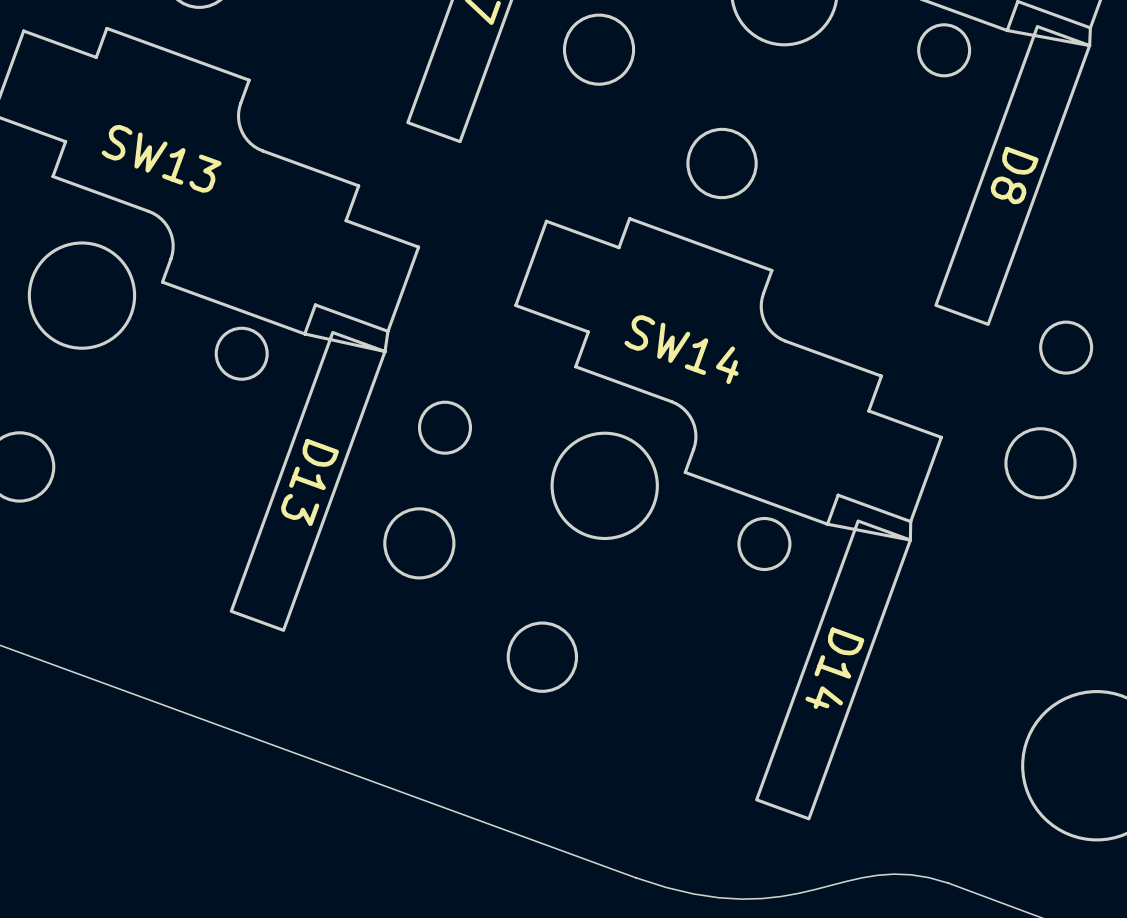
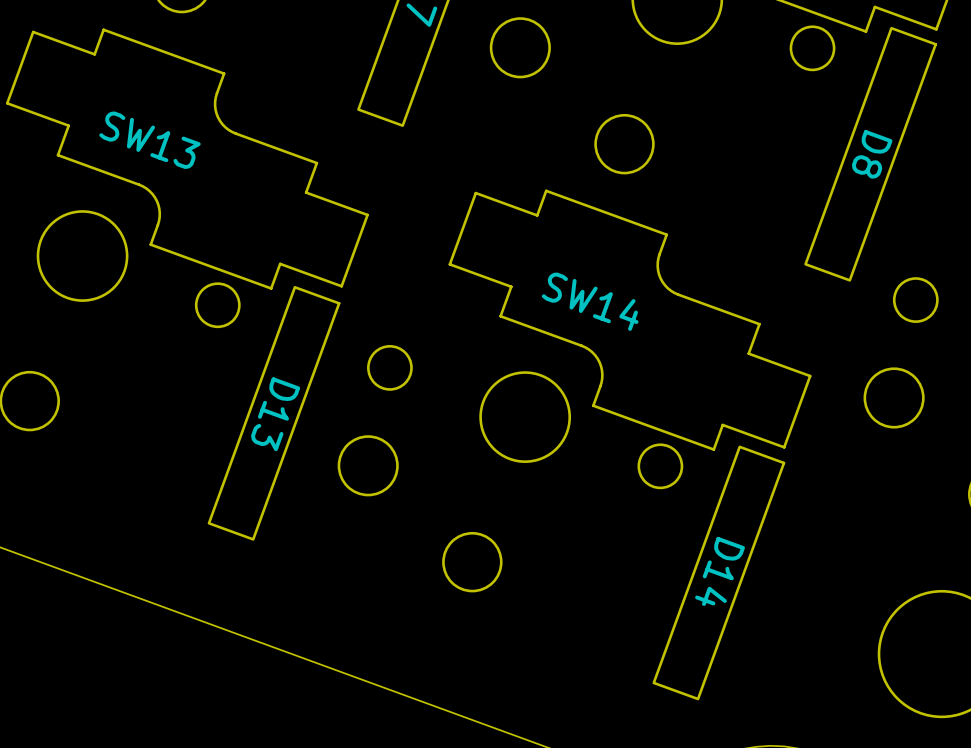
board edge: (1090, 27) (1089, 45) (1007, 30) -> none
board edge: (387, 331) (385, 351) (304, 333) -> none
board edge: (910, 521) (910, 540) (827, 524) -> none

